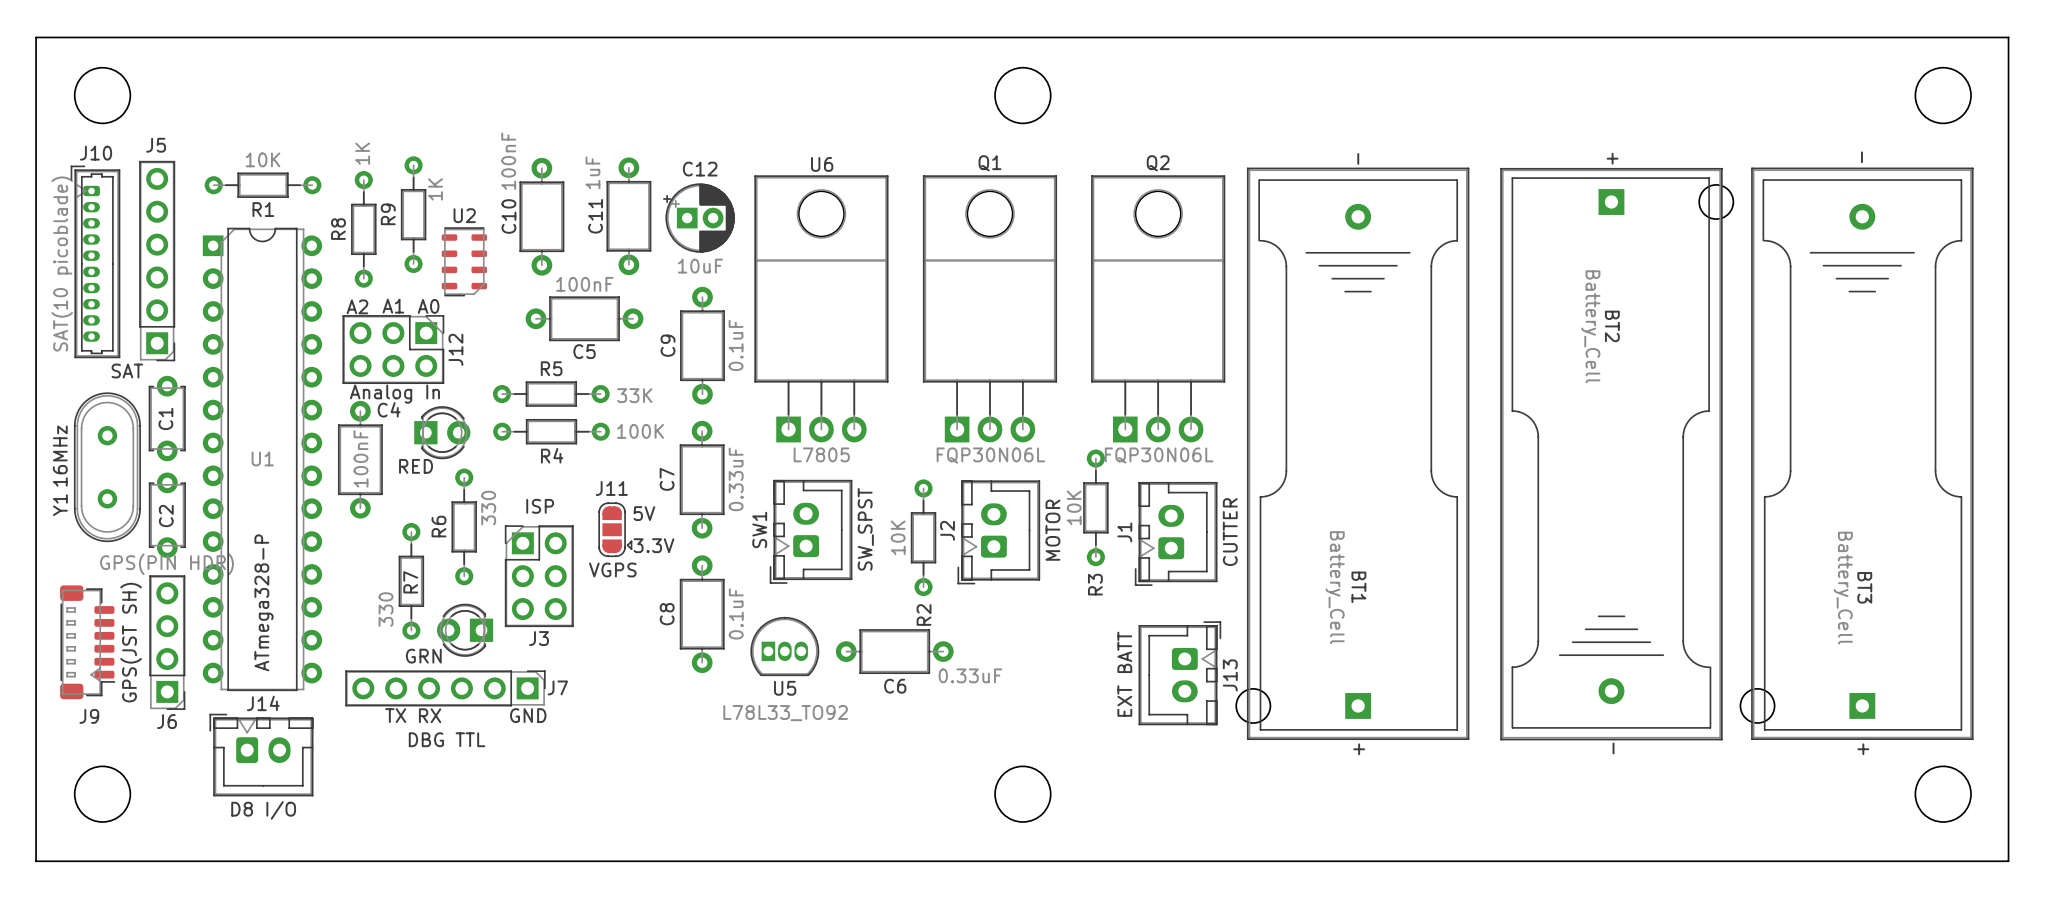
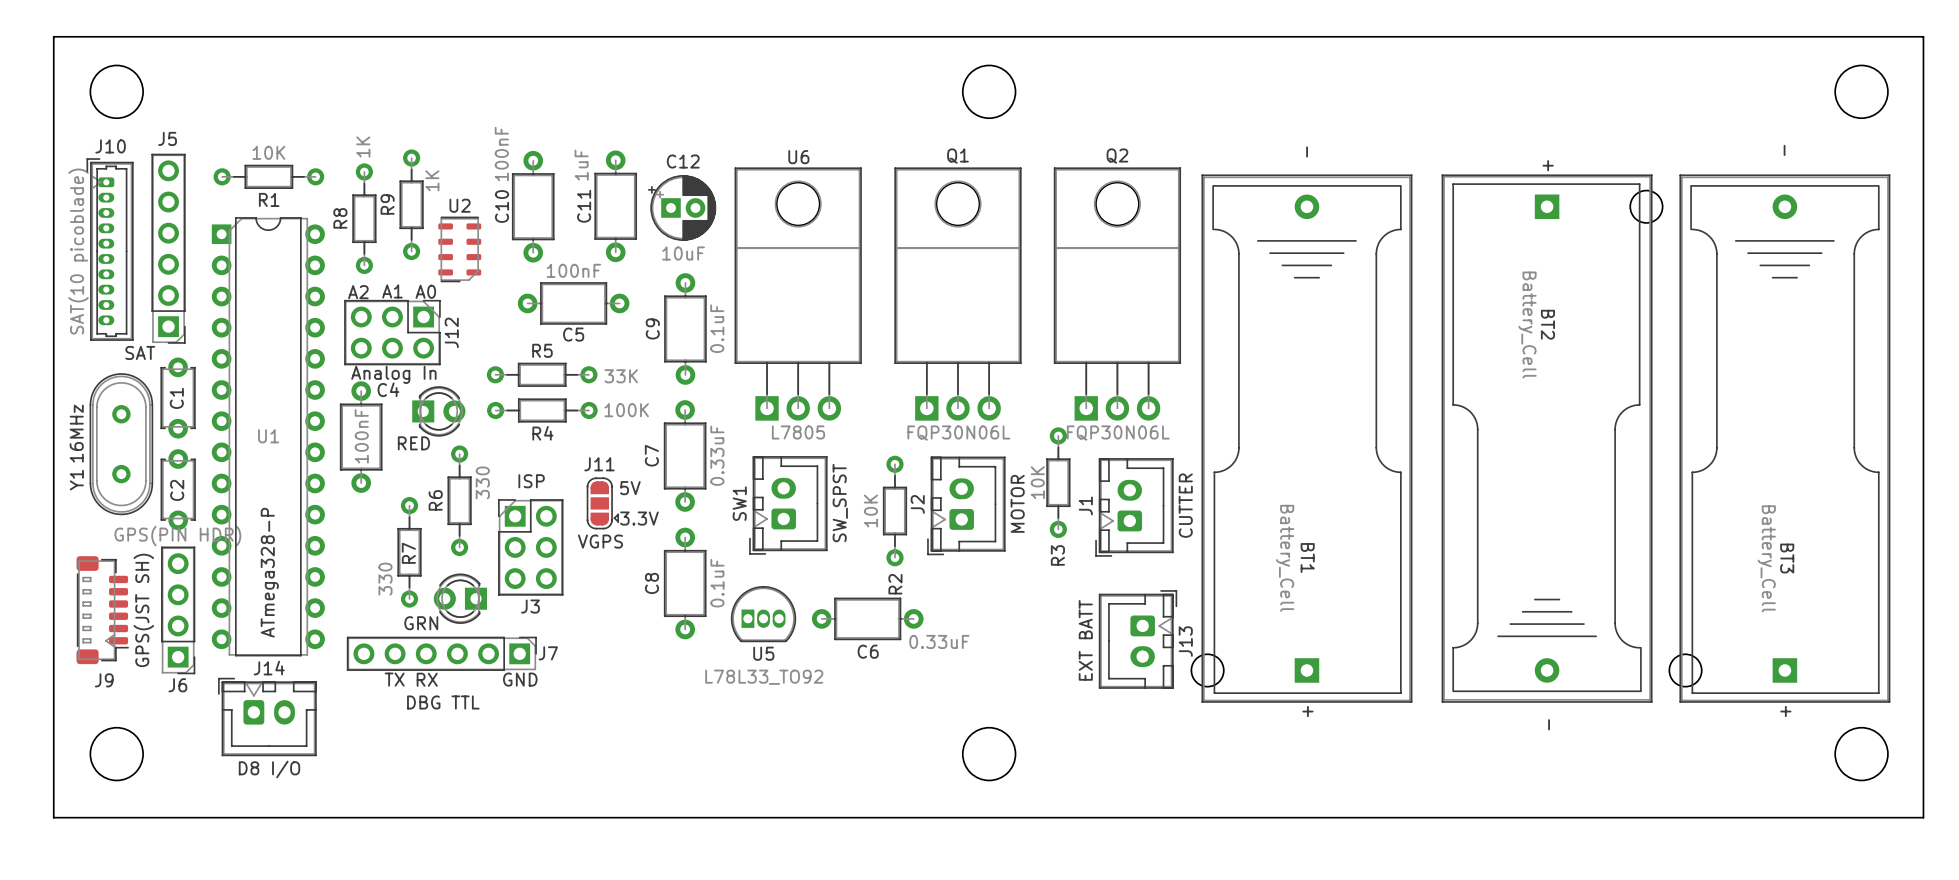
BT1 footprint: [1236, 167, 1470, 740] -> [1191, 174, 1413, 703]
BT2 footprint: [1500, 167, 1734, 741] -> [1441, 174, 1663, 703]
BT3 footprint: [1740, 167, 1974, 740] -> [1669, 174, 1891, 703]

